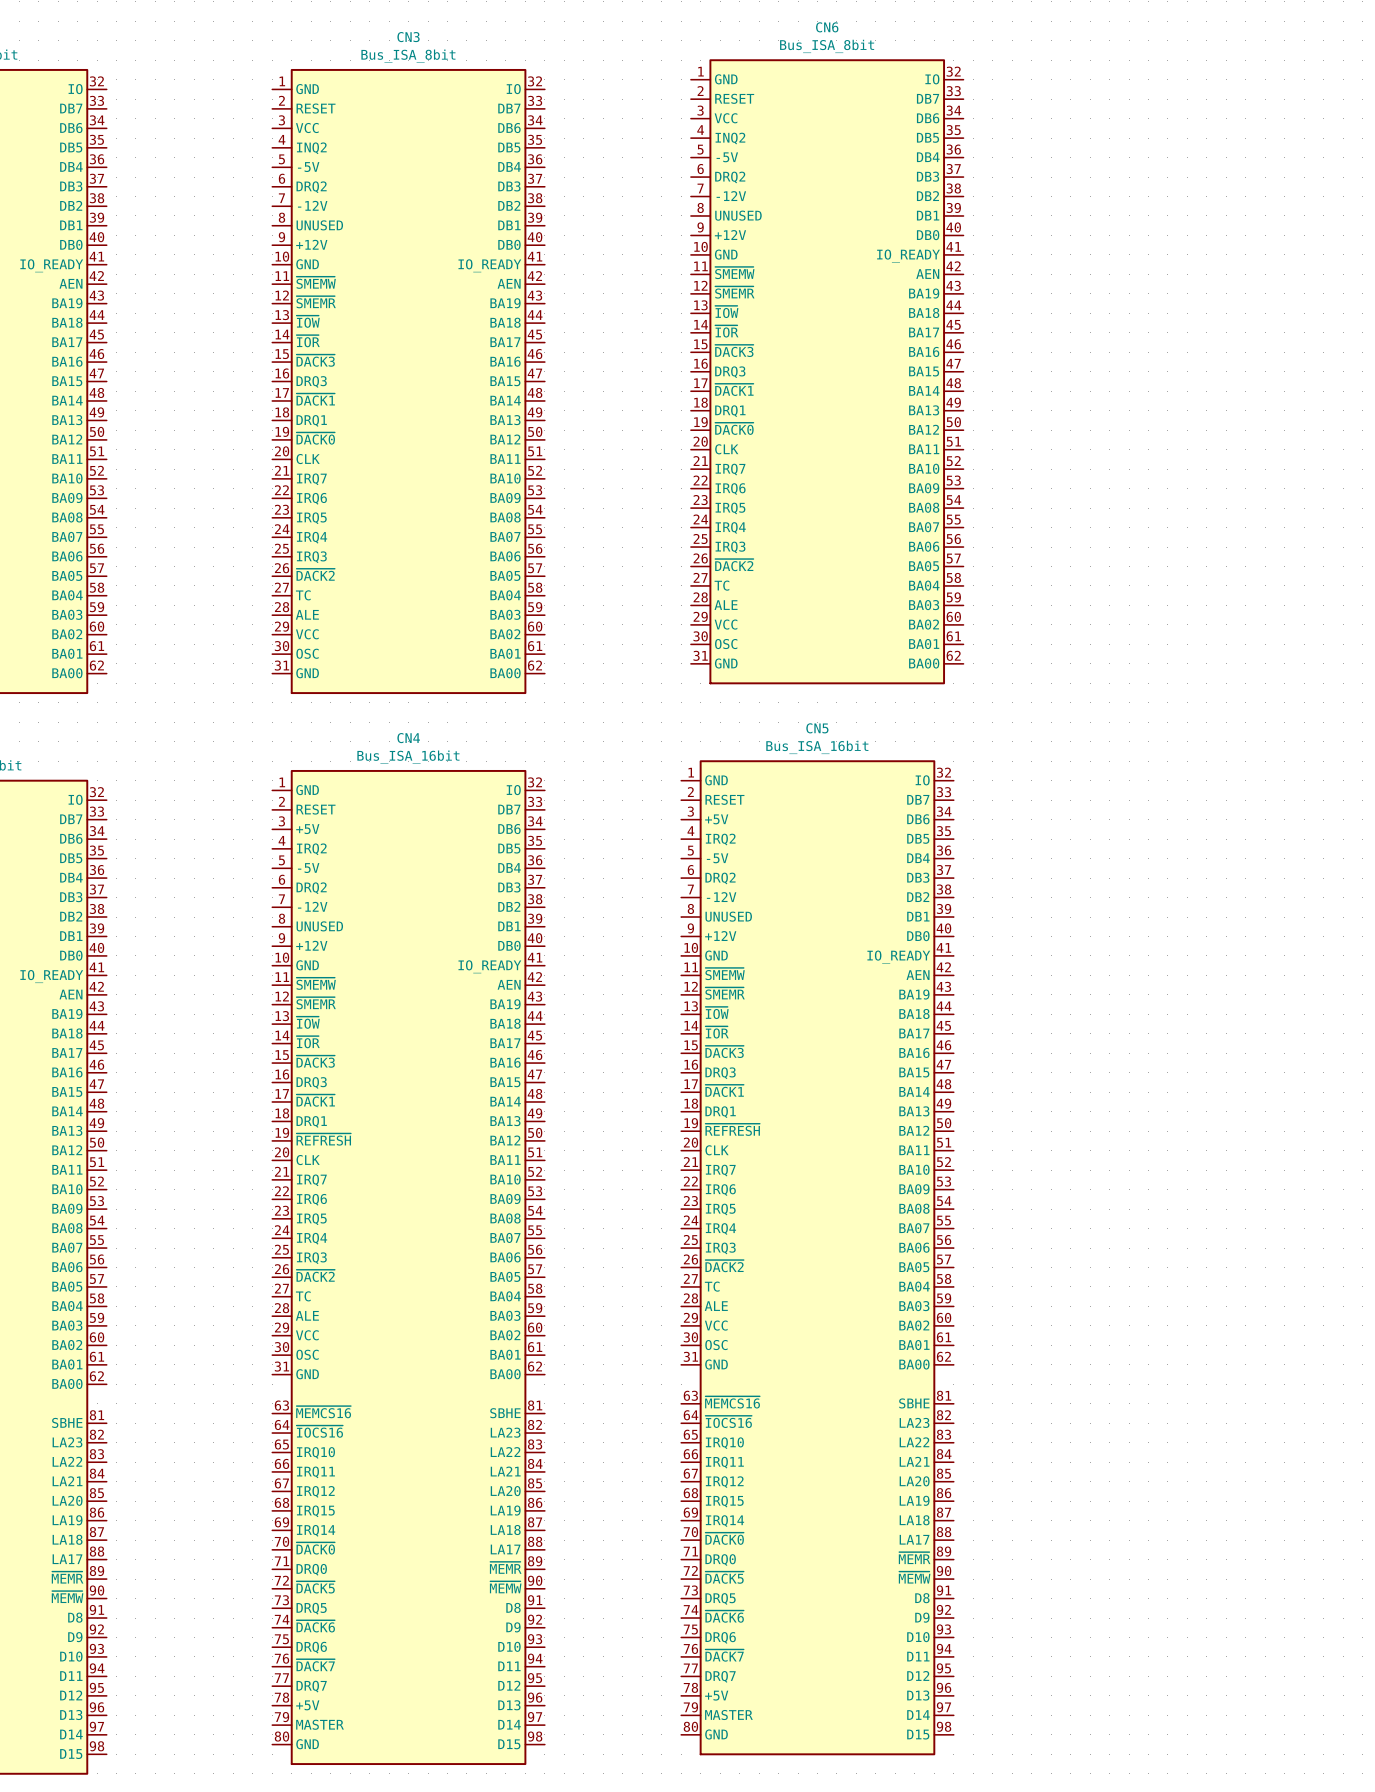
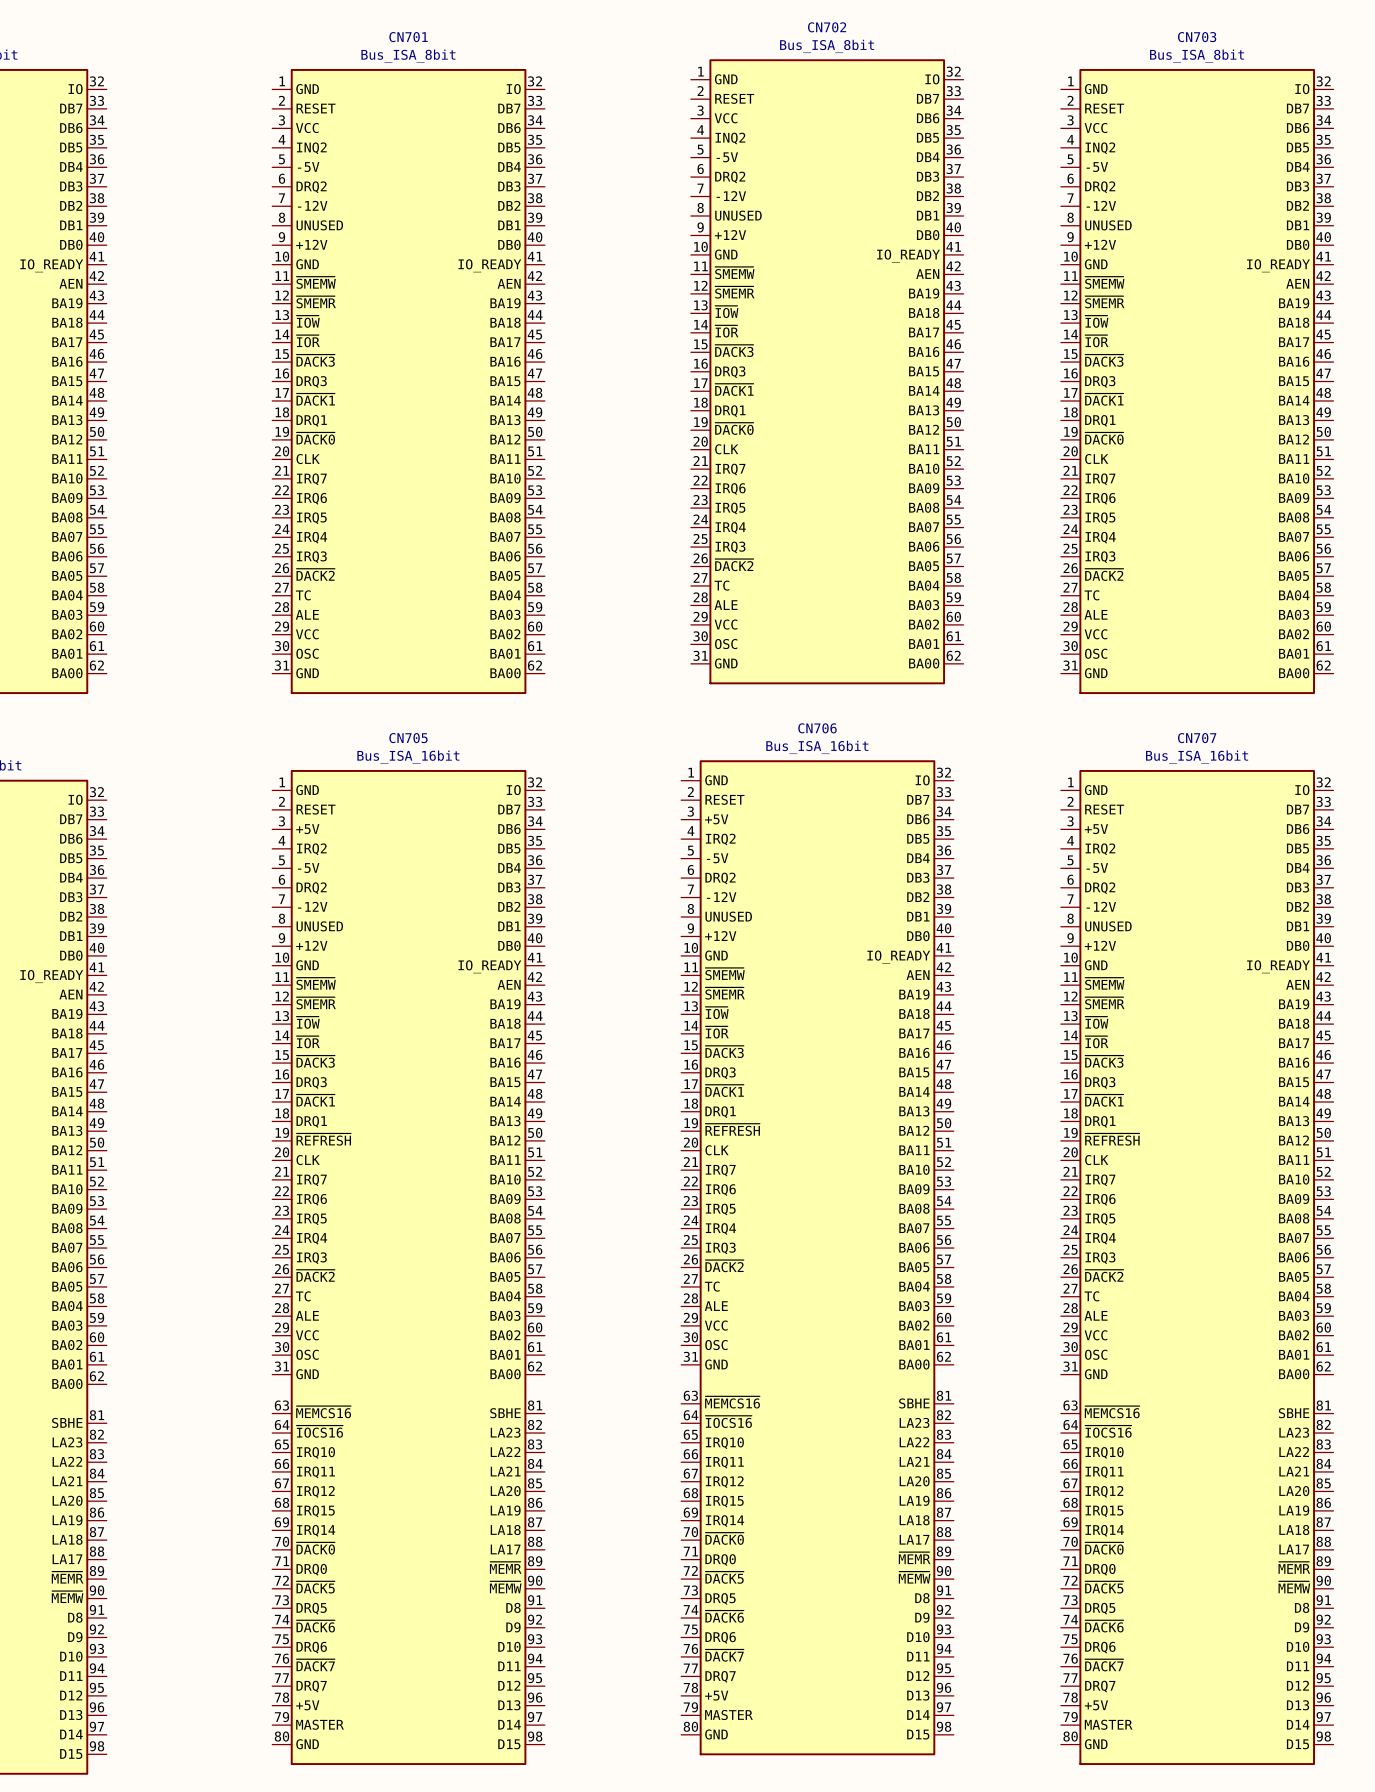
CN6 name: CN6 (827, 27) -> CN702 (827, 27)
CN3 name: CN3 (408, 37) -> CN701 (408, 37)
CN703: none -> Bus_ISA_8bit (1197, 381)
CN5 name: CN5 (817, 728) -> CN706 (817, 728)
CN4 name: CN4 (408, 738) -> CN705 (408, 738)
CN707: none -> Bus_ISA_16bit (1197, 1267)

